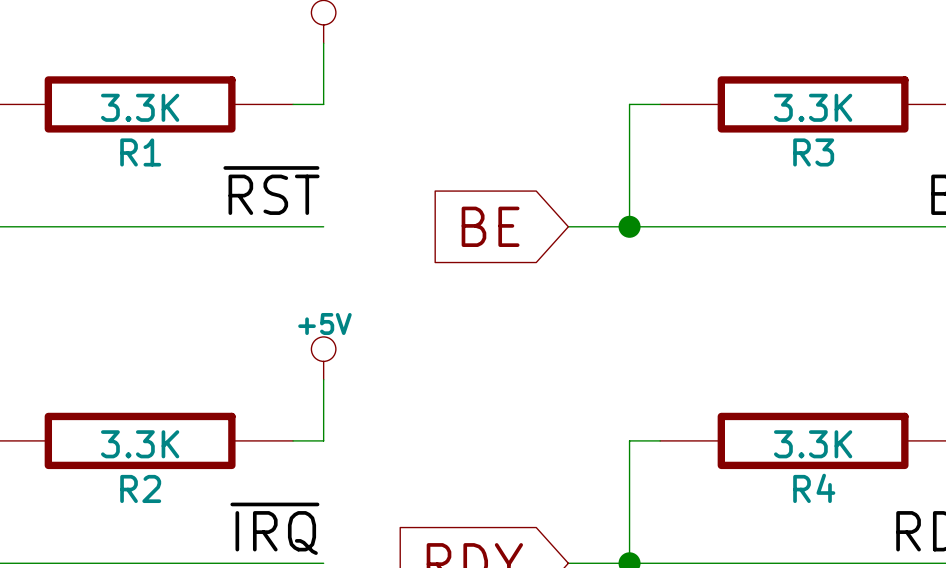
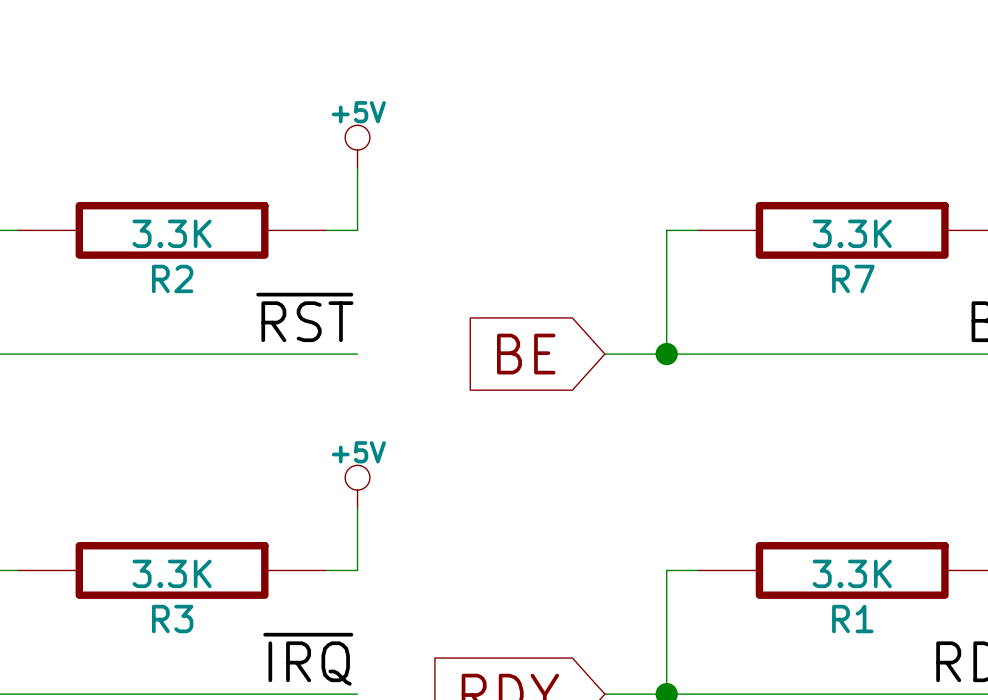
R1 name: R1 (140, 152) -> R2 (172, 278)
R3 name: R3 (813, 152) -> R7 (853, 278)
R2 name: R2 (140, 488) -> R3 (172, 619)
R4 name: R4 (814, 488) -> R1 (852, 619)

